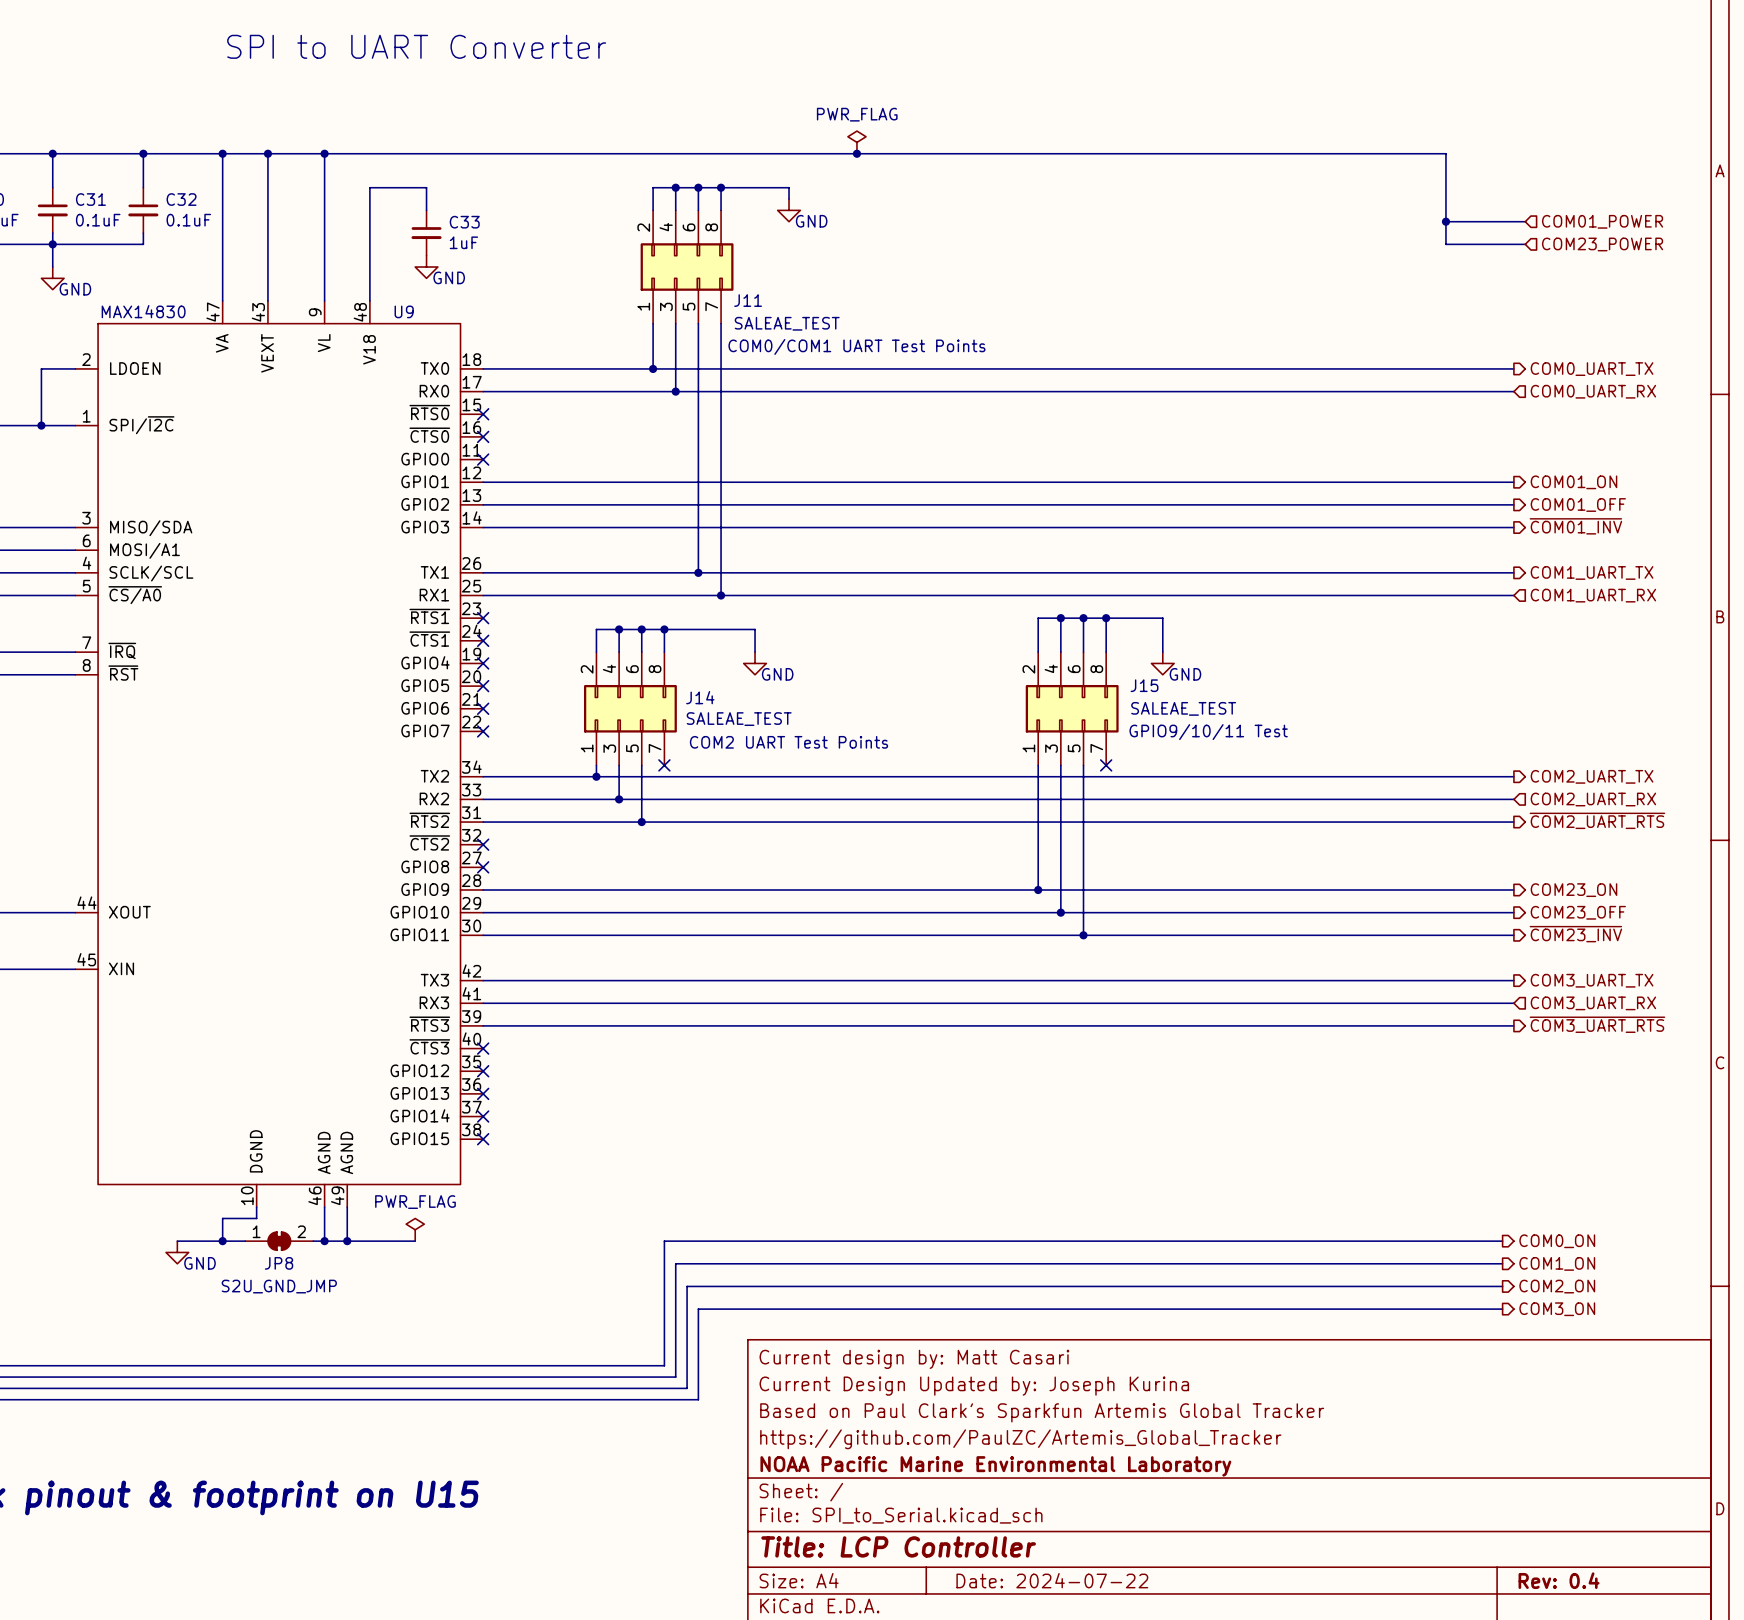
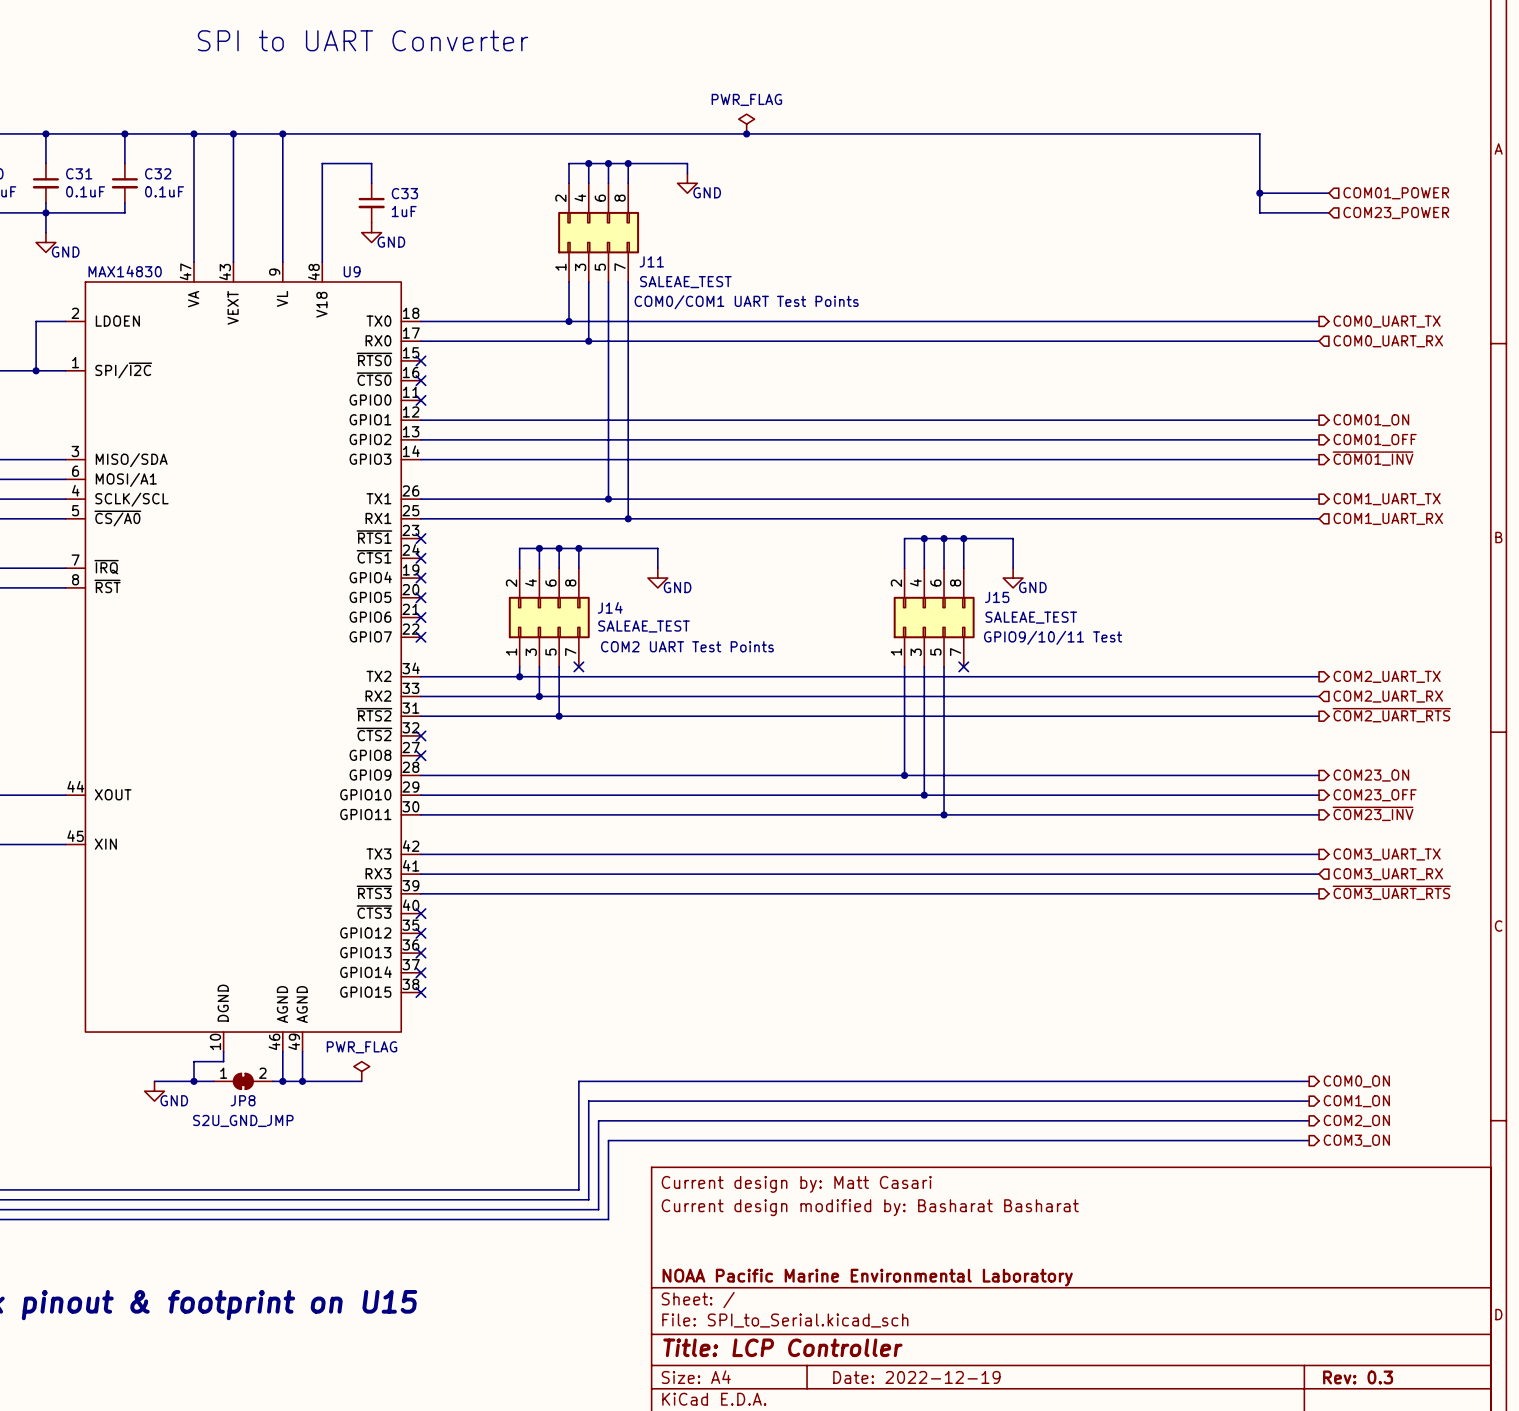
title block: Current Design Updated by: Joseph Kurina (974, 1386) -> Current design modified by: Basharat Basharat (870, 1207)
title block: Based on Paul Clark's Sparkfun Artemis Global Tracker (1042, 1412) -> none
title block: https://github.com/PaulZC/Artemis_Global_Tracker (1020, 1439) -> none
title block: Date: 2024-07-22 (1052, 1580) -> Date: 2022-12-19 (916, 1377)
title block: Rev: 0.4 (1559, 1580) -> Rev: 0.3 (1358, 1377)

